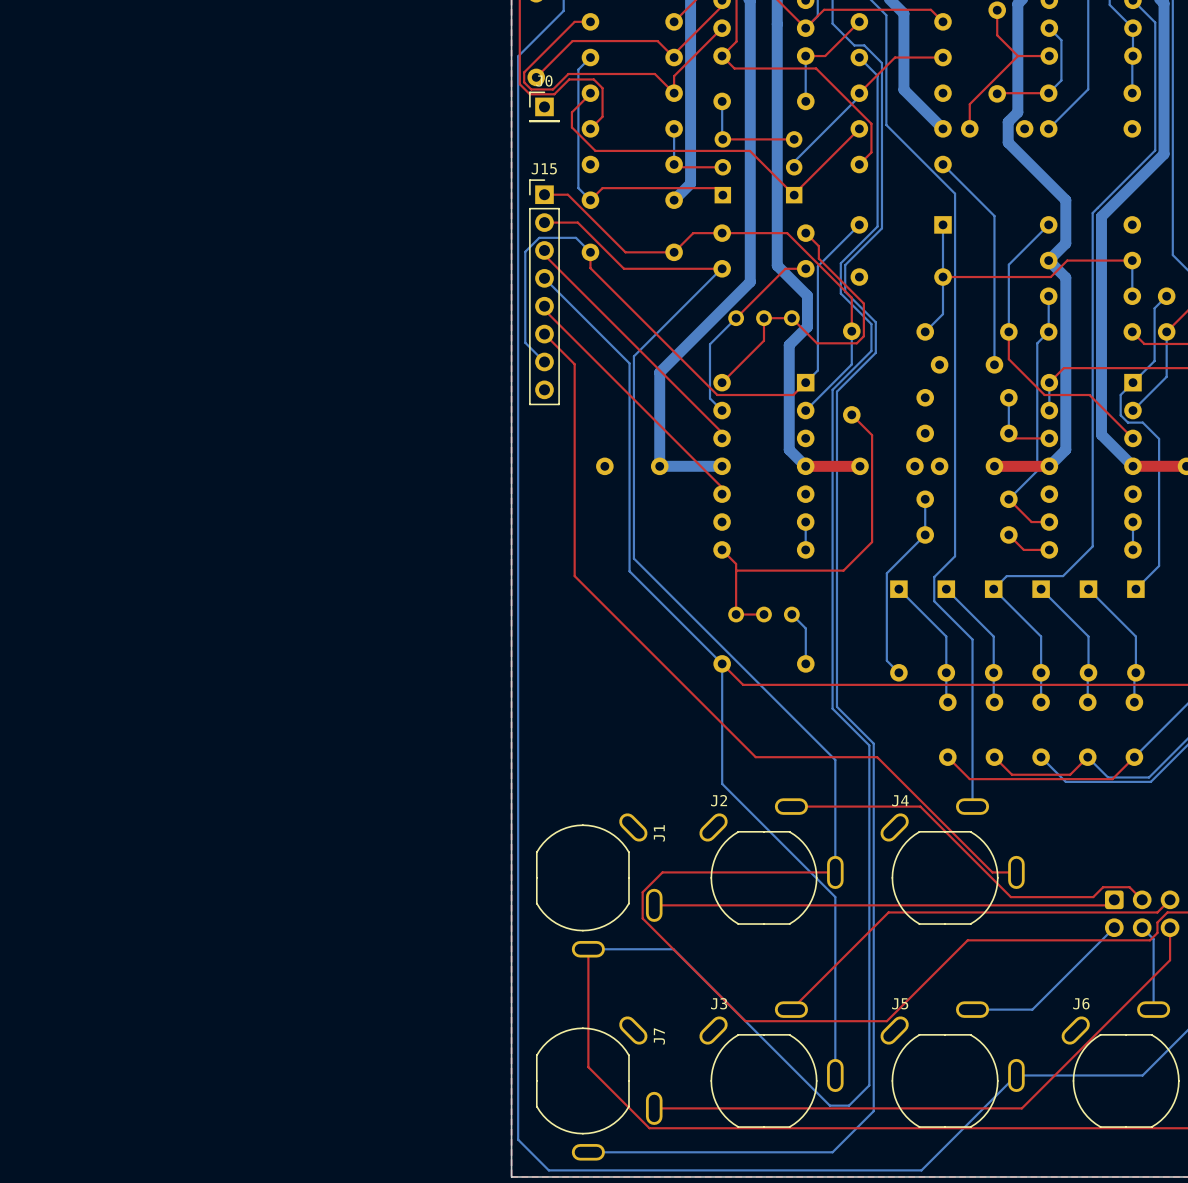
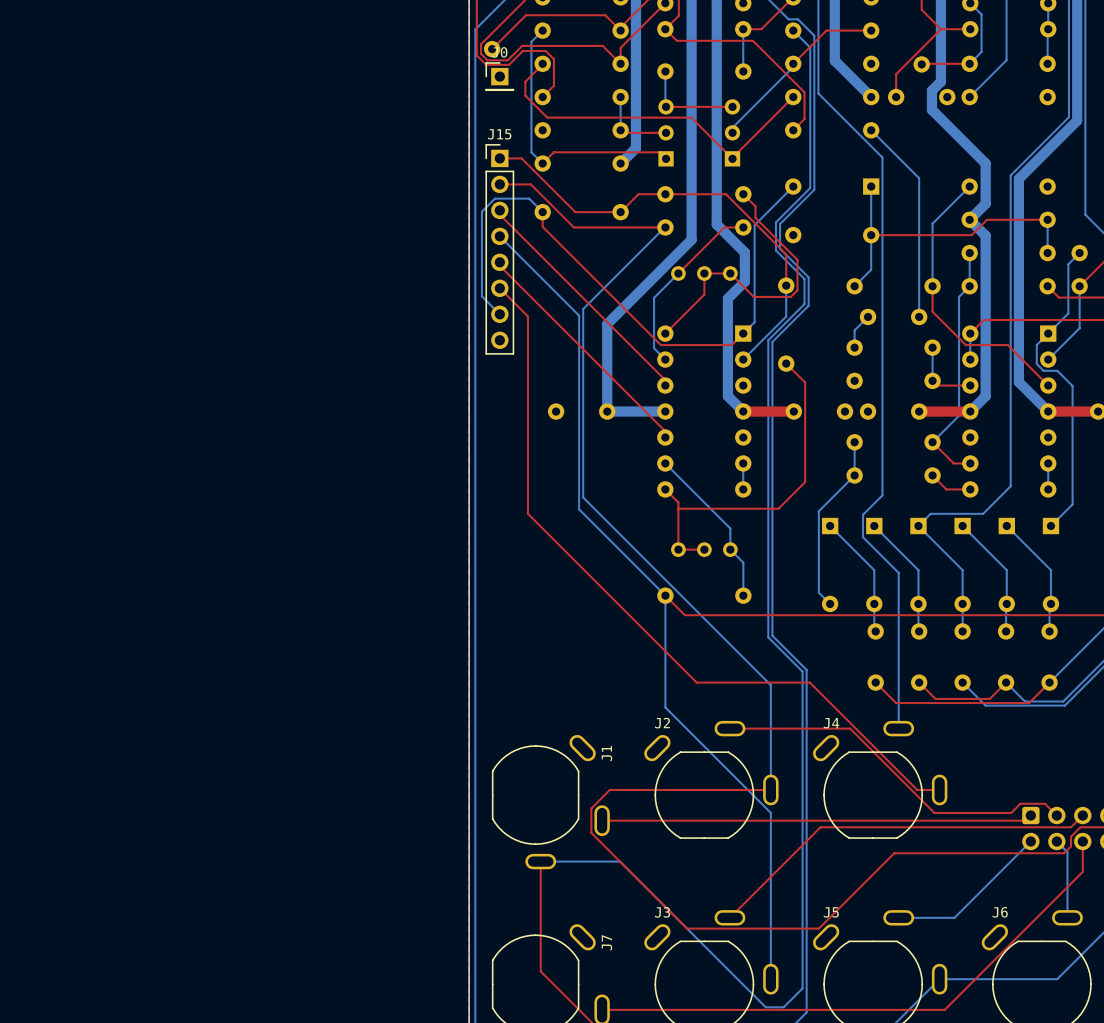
bottom track: none -> (868, 316) (854, 330) (854, 347)
bottom track: none -> (665, 463) (730, 528) (730, 549)

